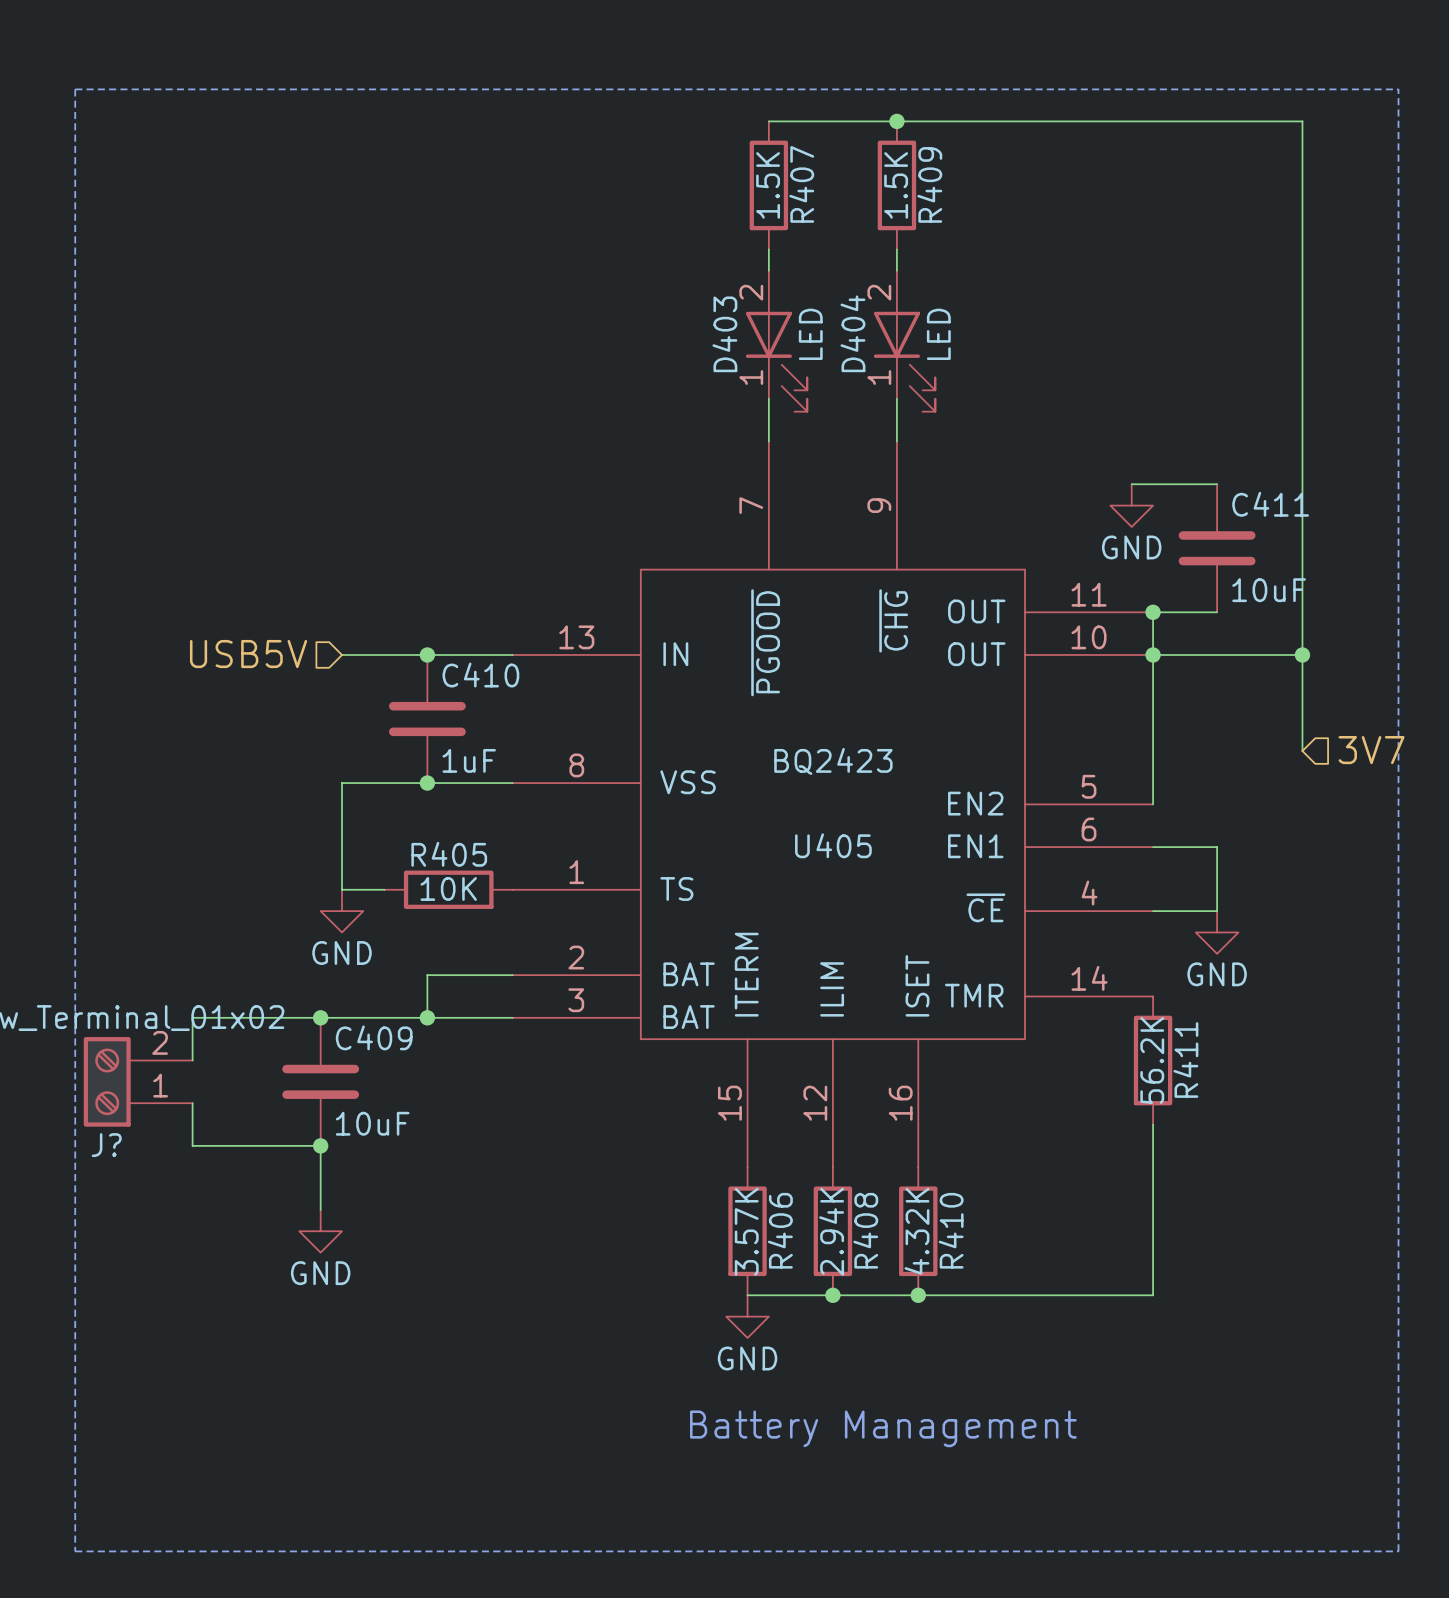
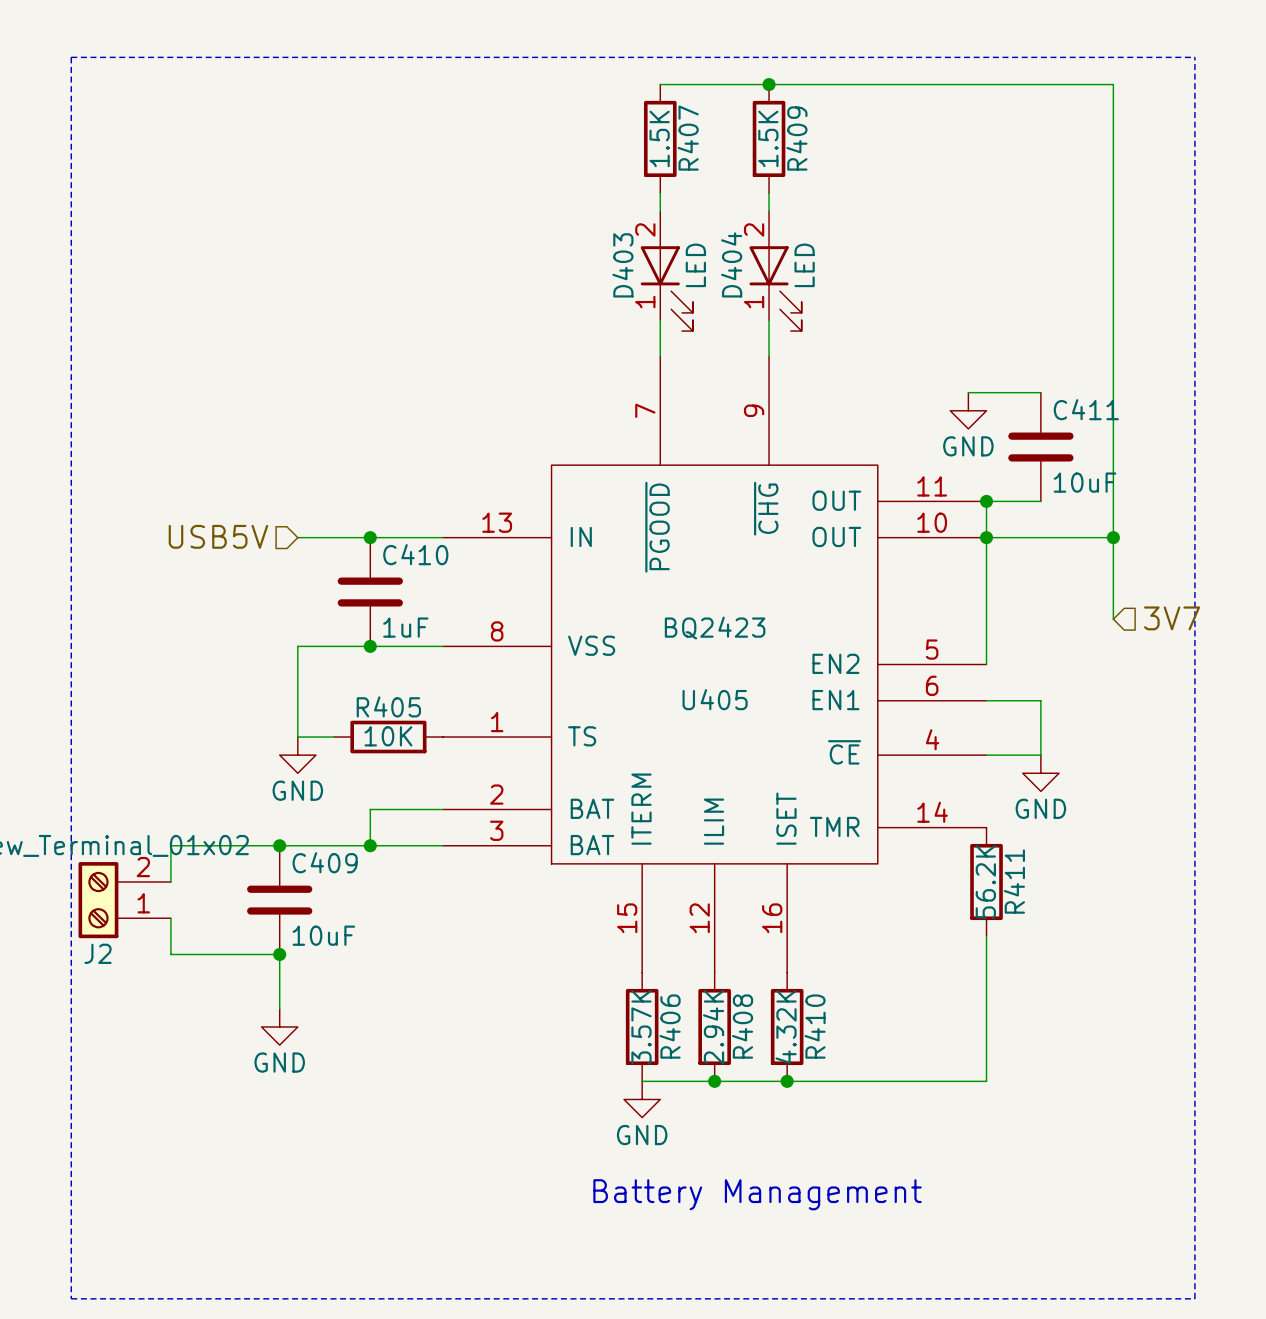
J? name: J? (106, 1145) -> J2 (98, 953)

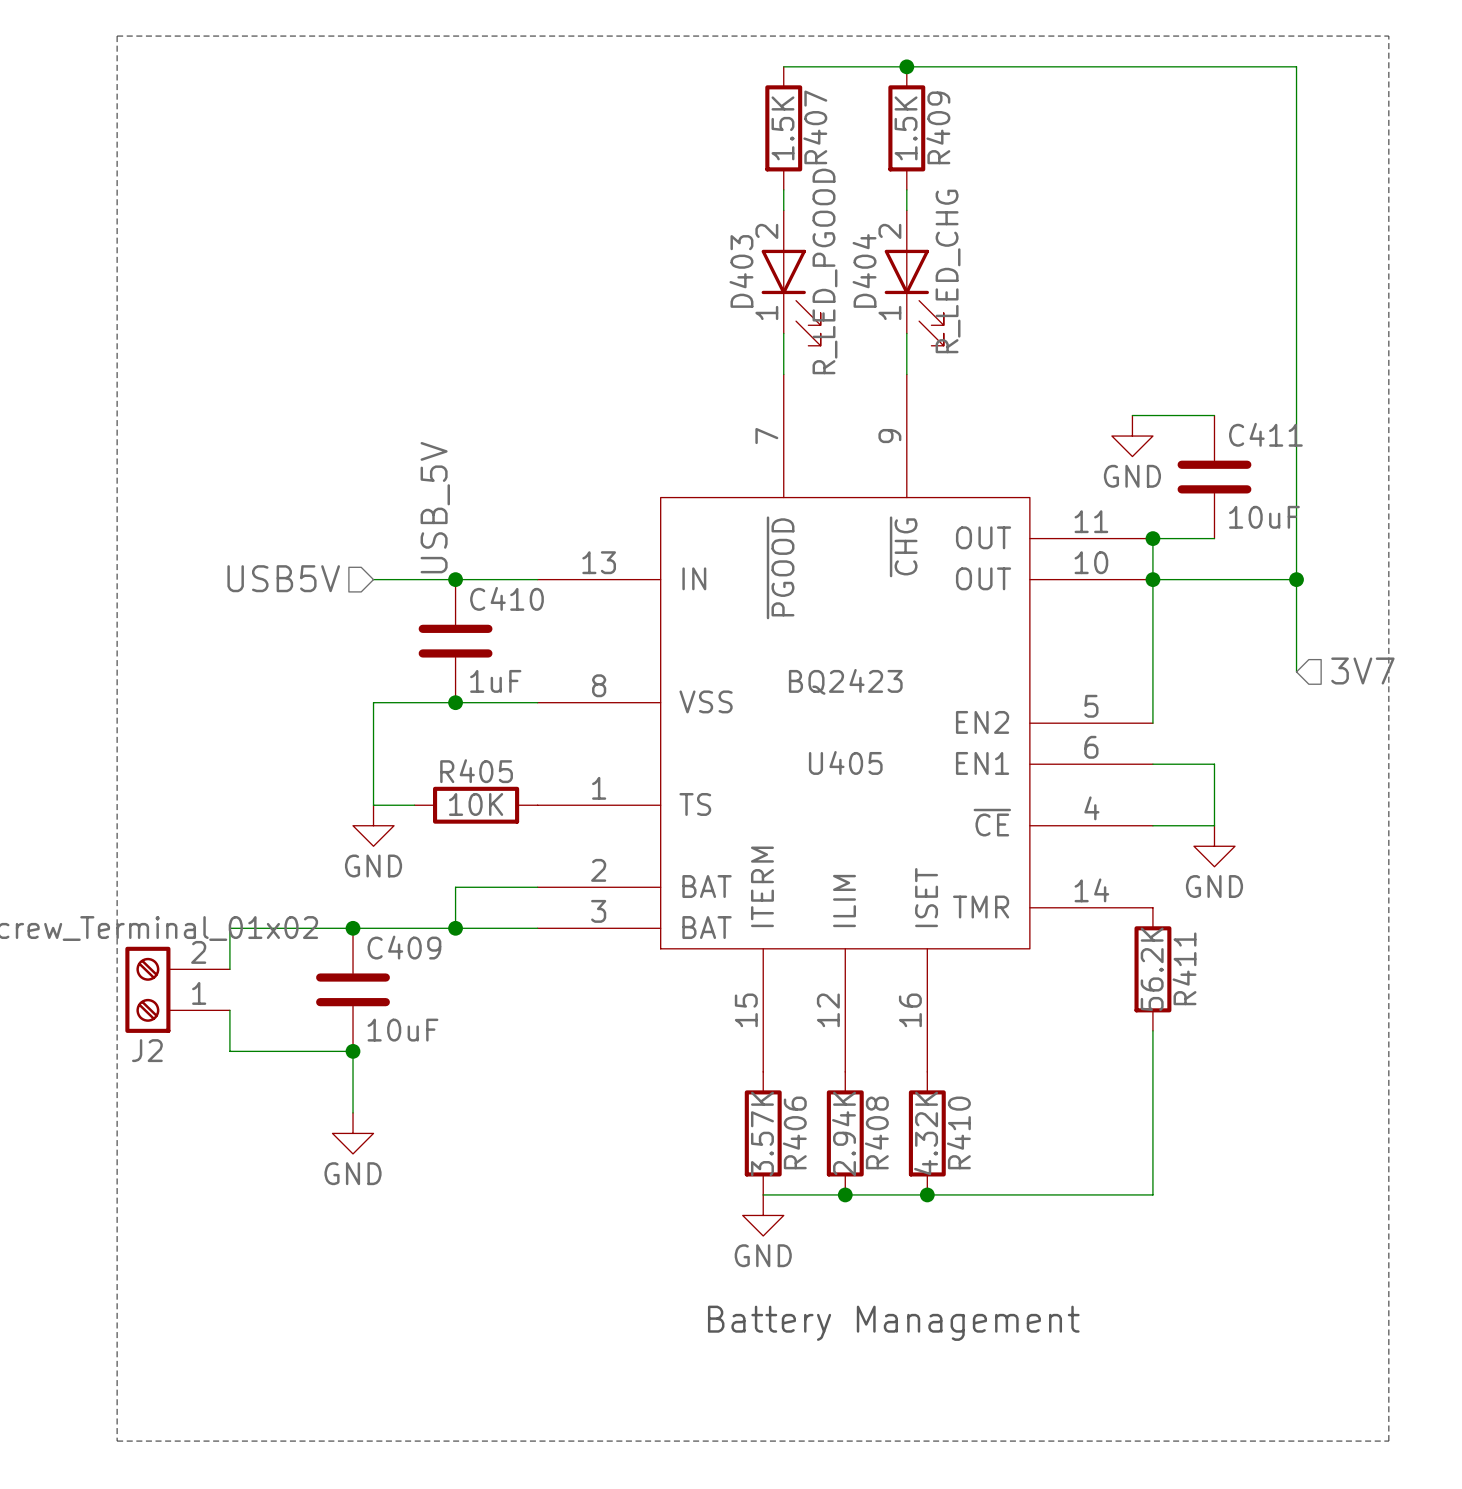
D403 value: LED (695, 265) -> R_LED_PGOOD (824, 271)
D404 value: LED (804, 265) -> R_LED_CHG (948, 271)
label: none -> USB_5V (435, 507)

